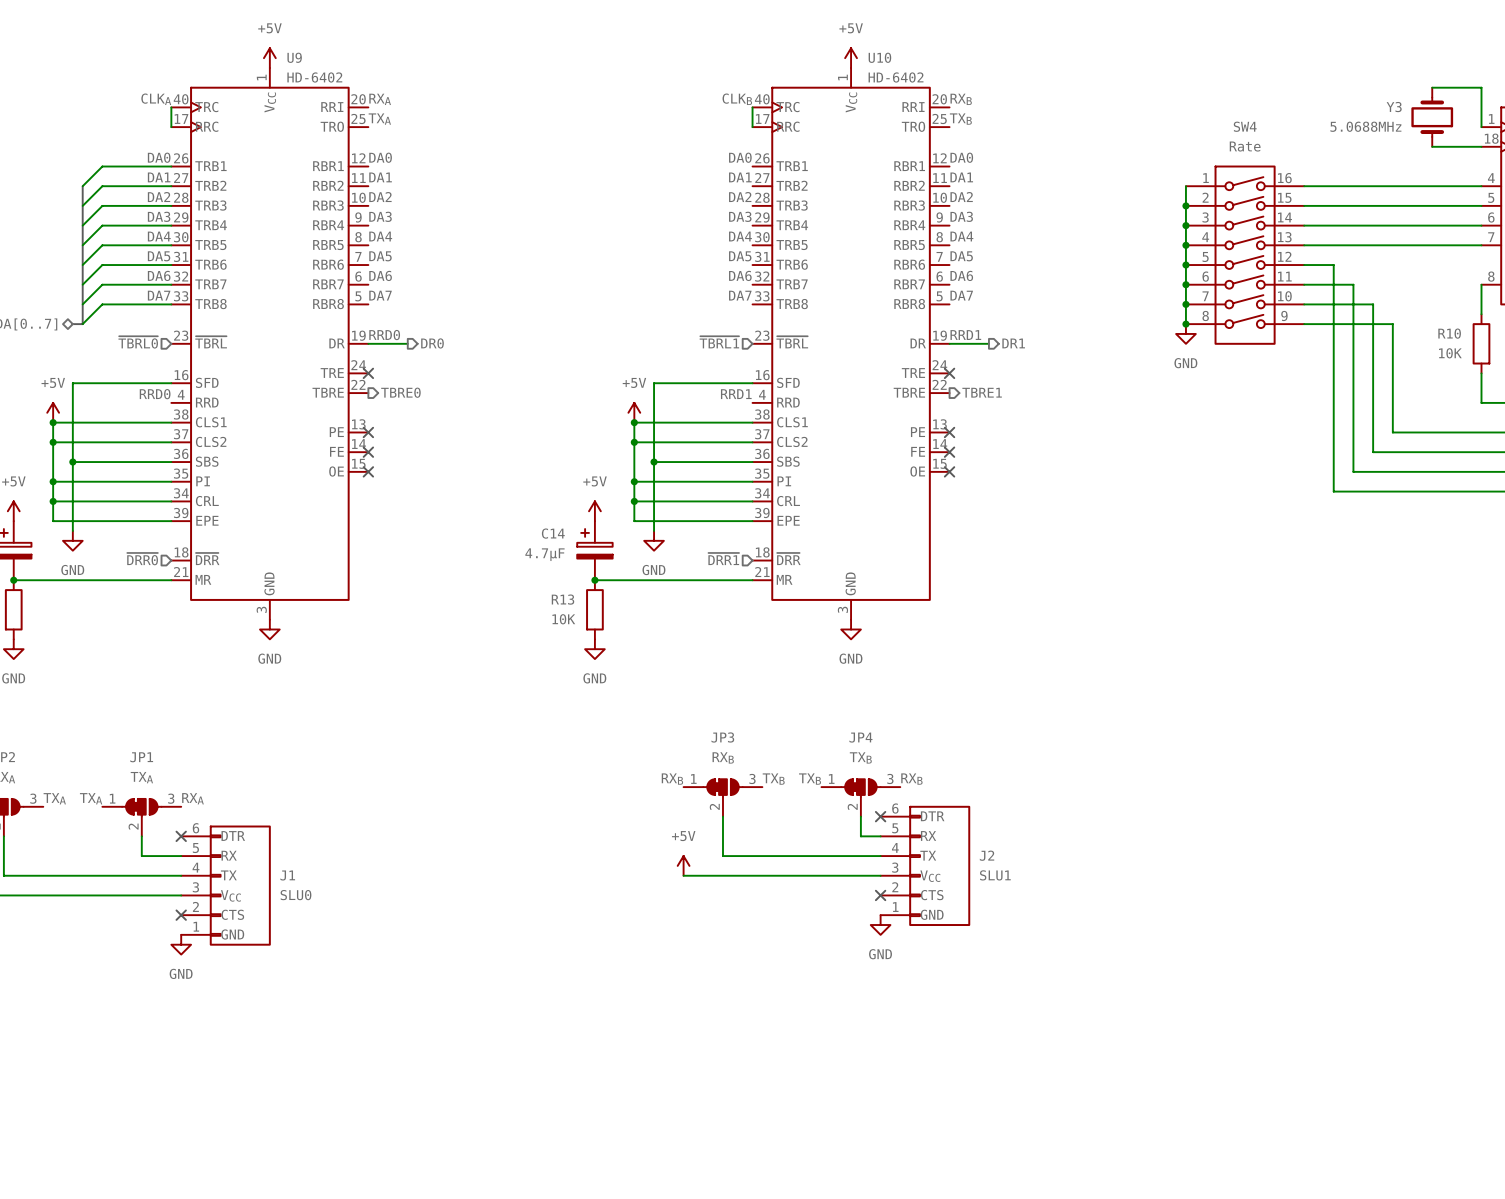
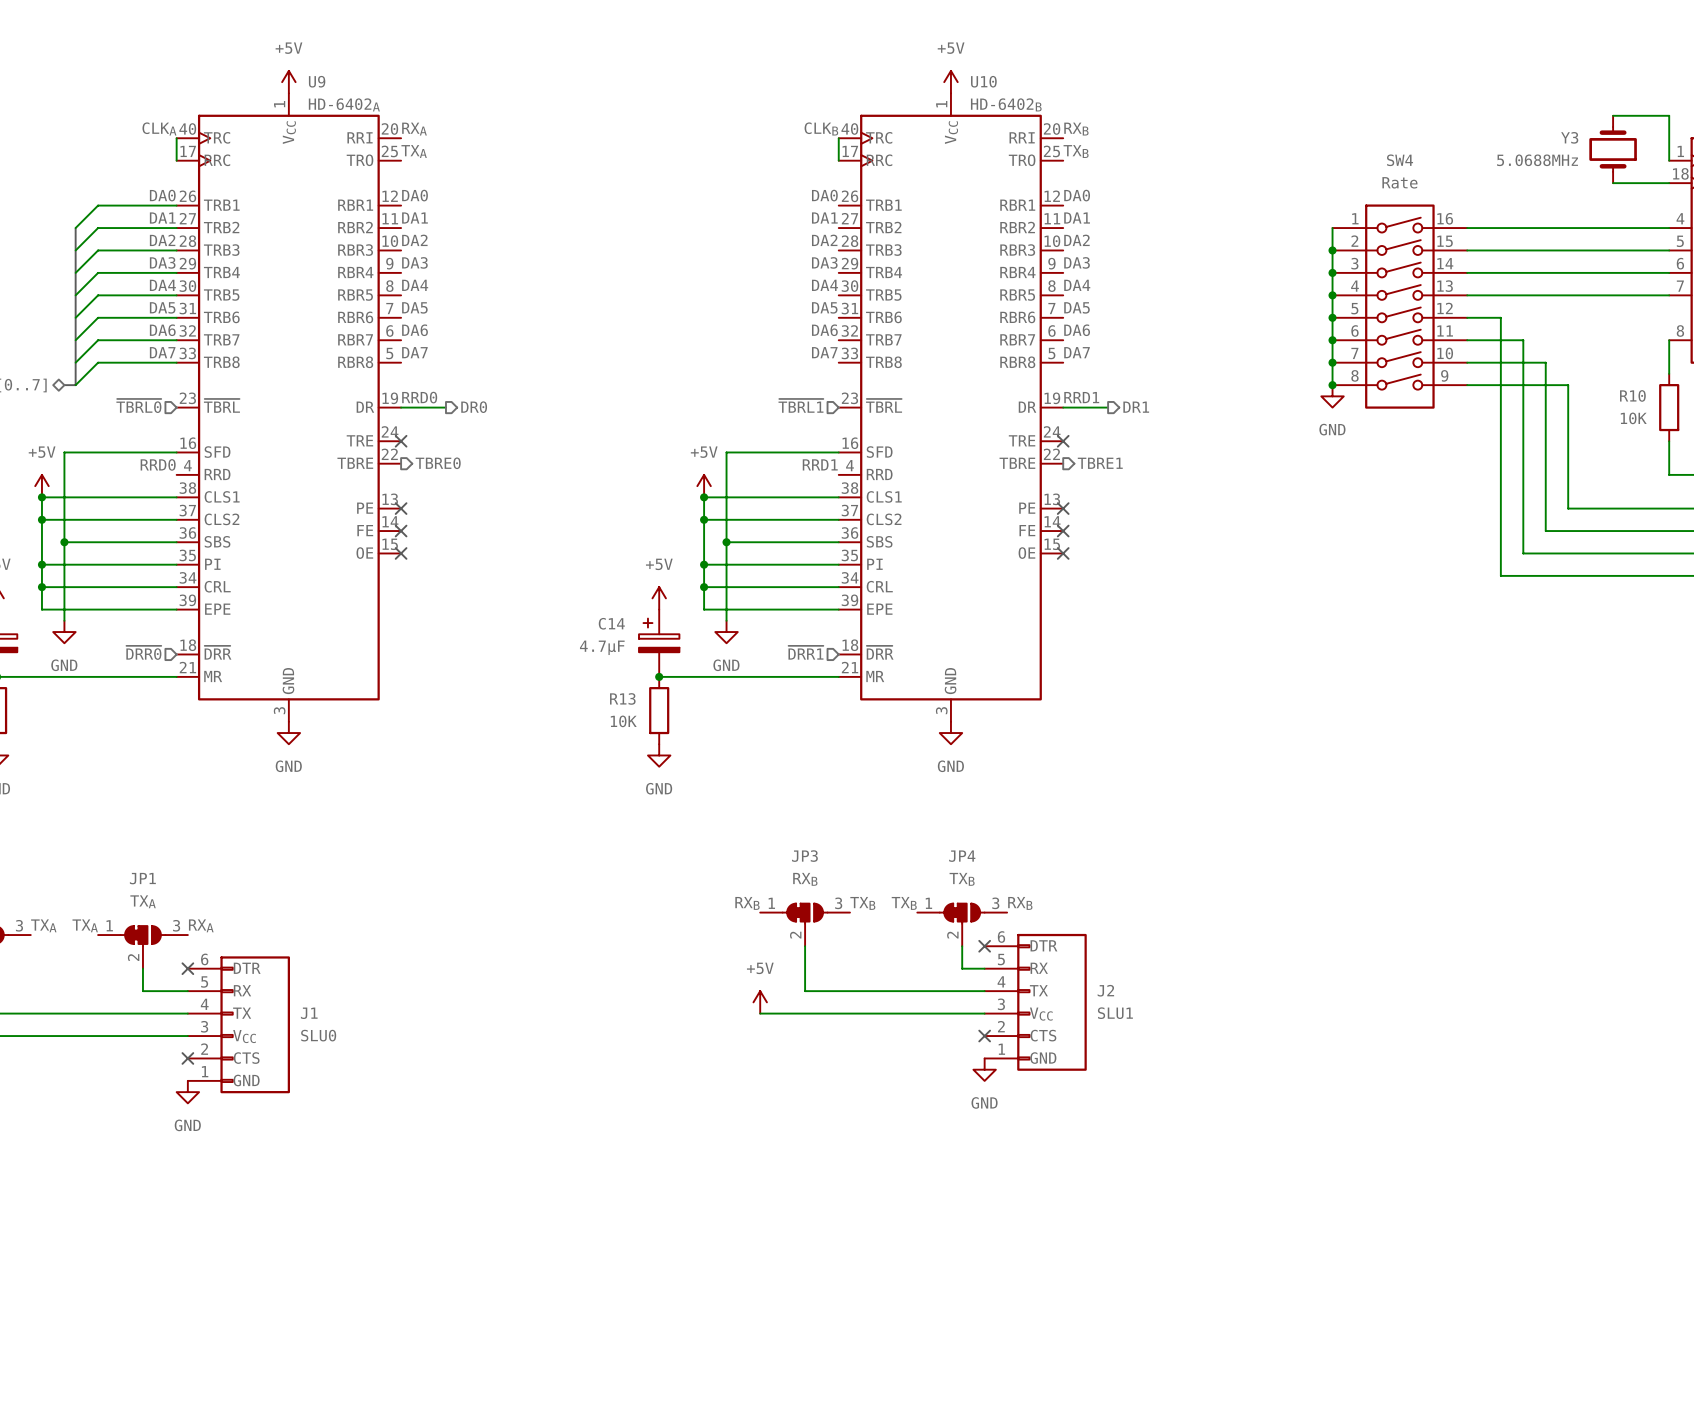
U9 value: HD-6402 (314, 77) -> HD-6402A (344, 104)
U10 value: HD-6402 (896, 77) -> HD-6402B (1006, 104)

